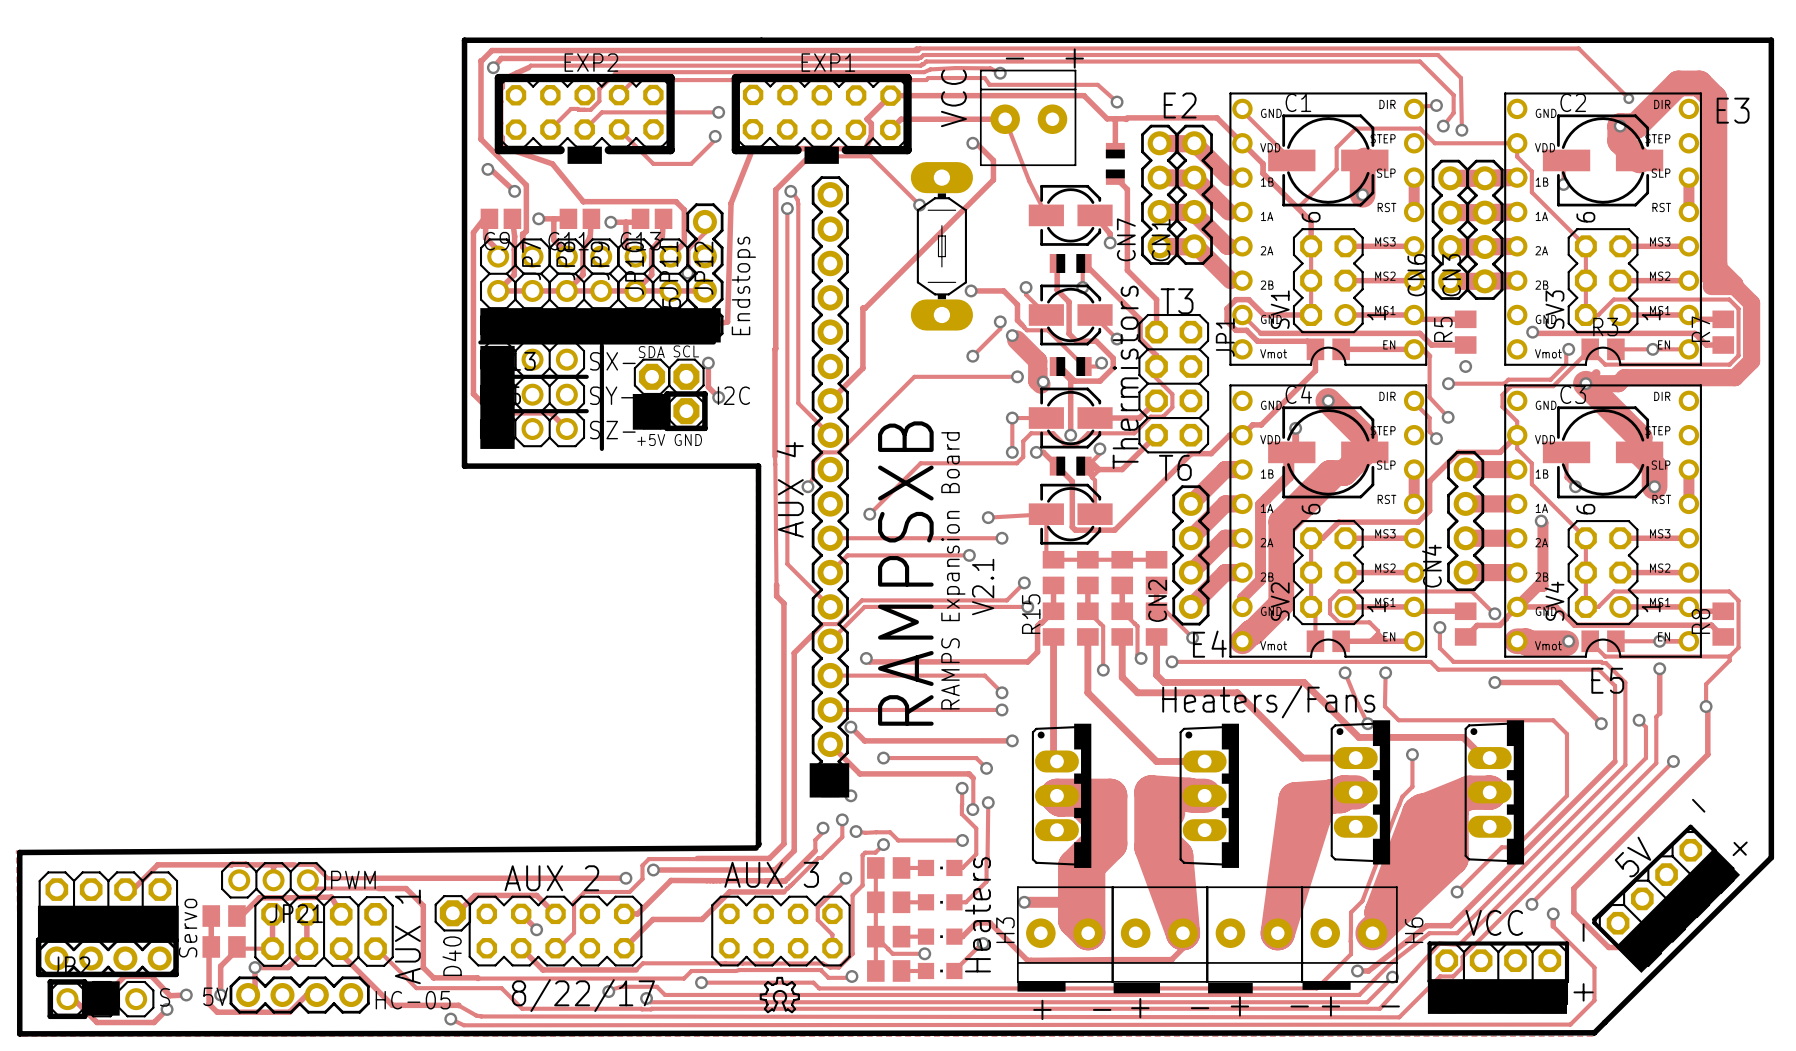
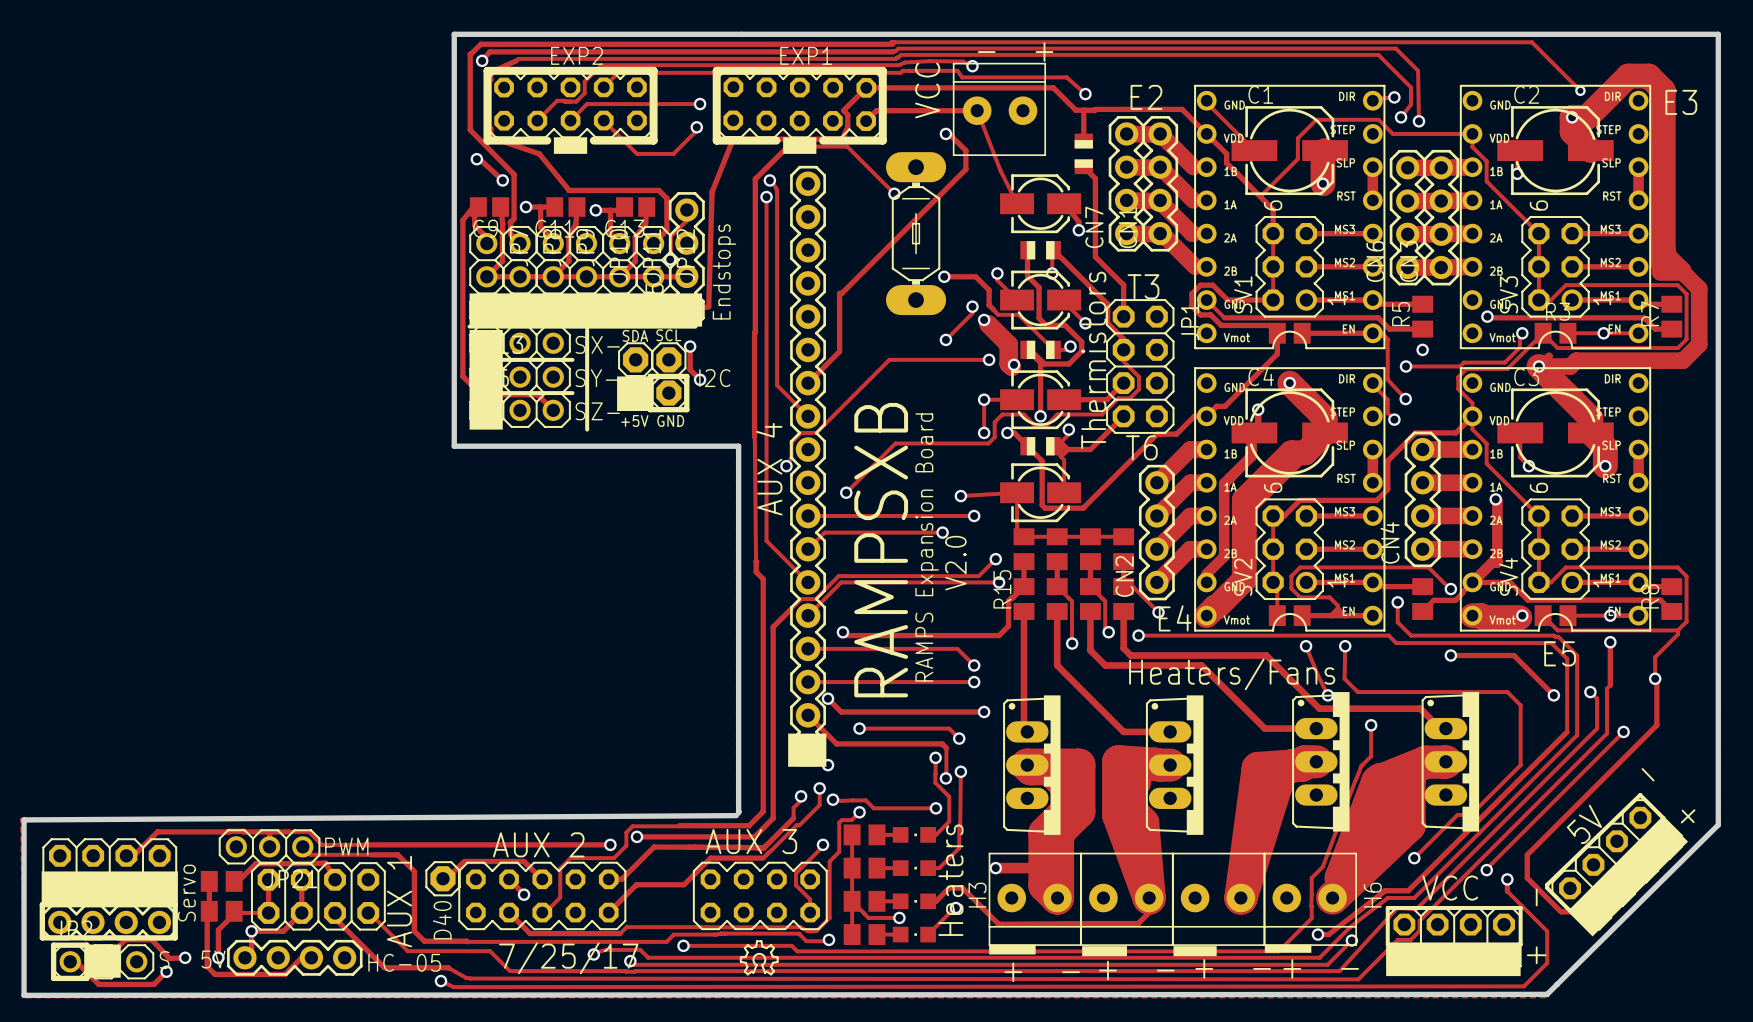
text: V2.1 (983, 587) -> V2.0 (955, 563)
text: 8/22/17 (583, 995) -> 7/25/17 (568, 958)

